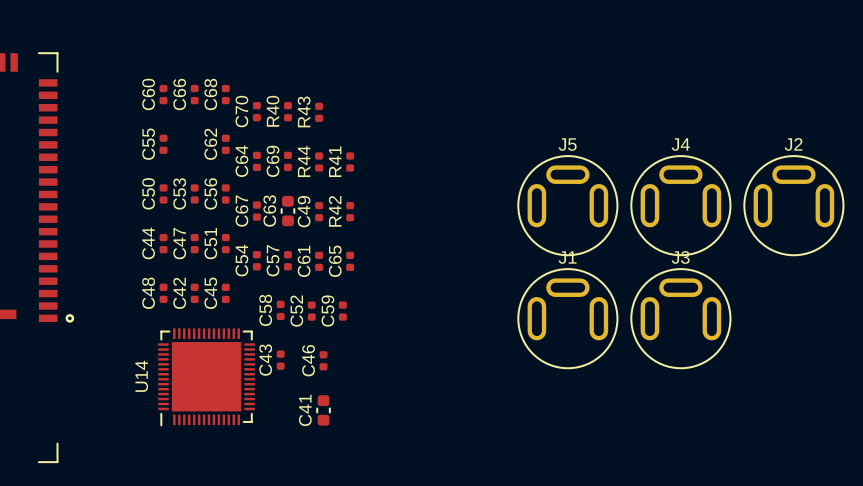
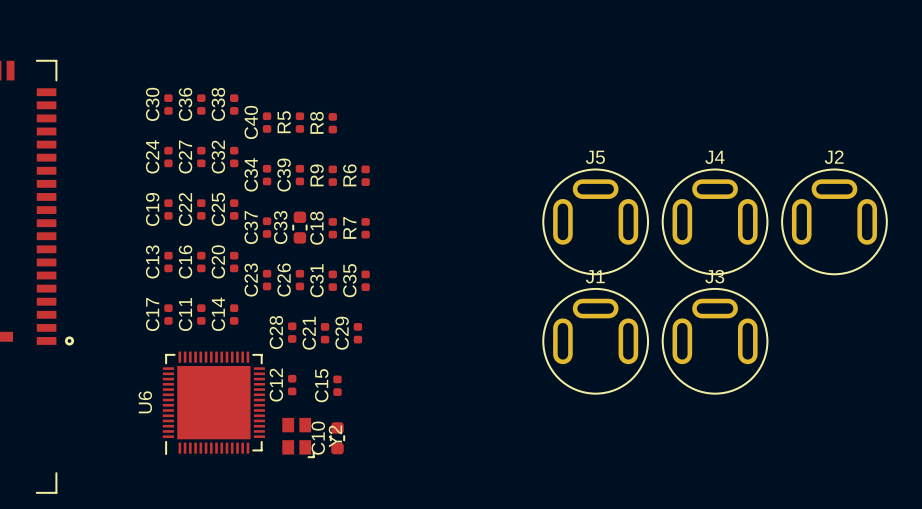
C60 name: C60 (148, 94) -> C30 (152, 104)
C66 name: C66 (179, 94) -> C36 (185, 104)
C68 name: C68 (210, 94) -> C38 (218, 104)
C70 name: C70 (241, 111) -> C40 (251, 122)
R40 name: R40 (273, 111) -> R5 (284, 122)
R43 name: R43 (304, 111) -> R8 (316, 122)
C55 name: C55 (148, 144) -> C24 (152, 156)
C27: none -> (201, 157)
C62 name: C62 (210, 144) -> C32 (218, 157)
C64 name: C64 (241, 161) -> C34 (251, 174)
C69 name: C69 (273, 161) -> C39 (284, 175)
R44 name: R44 (304, 161) -> R9 (316, 175)
R41 name: R41 (335, 161) -> R6 (349, 175)
C50 name: C50 (148, 193) -> C19 (152, 209)
C53 name: C53 (179, 193) -> C22 (185, 209)
C56 name: C56 (210, 193) -> C25 (218, 209)
C67 name: C67 (241, 211) -> C37 (251, 227)
C63 name: C63 (269, 211) -> C33 (280, 227)
C49 name: C49 (304, 211) -> C18 (316, 228)
R42 name: R42 (335, 211) -> R7 (349, 227)
C44 name: C44 (148, 243) -> C13 (152, 261)
C47 name: C47 (179, 243) -> C16 (185, 261)
C51 name: C51 (210, 243) -> C20 (218, 261)
C54 name: C54 (241, 260) -> C23 (251, 280)
C57 name: C57 (273, 260) -> C26 (284, 280)
C61 name: C61 (304, 261) -> C31 (316, 280)
C65 name: C65 (335, 261) -> C35 (349, 280)
C48 name: C48 (148, 293) -> C17 (152, 314)
C42 name: C42 (179, 293) -> C11 (185, 314)
C45 name: C45 (210, 293) -> C14 (218, 314)
C58 name: C58 (265, 310) -> C28 (276, 332)
C52 name: C52 (296, 311) -> C21 (309, 333)
C59 name: C59 (327, 311) -> C29 (342, 333)
C43 name: C43 (265, 360) -> C12 (276, 385)
C46 name: C46 (308, 360) -> C15 (321, 385)
U14 name: U14 (141, 376) -> U6 (145, 402)
Y2: none -> (298, 437)
C41 name: C41 (305, 410) -> C10 (318, 438)

